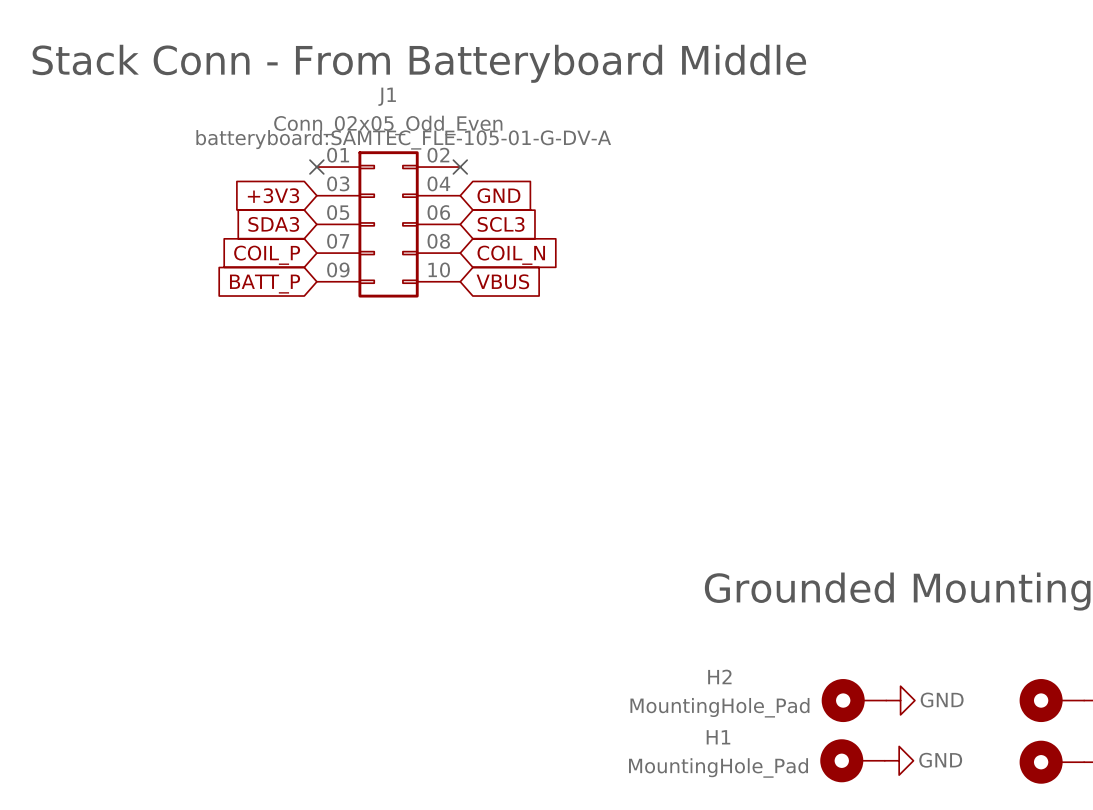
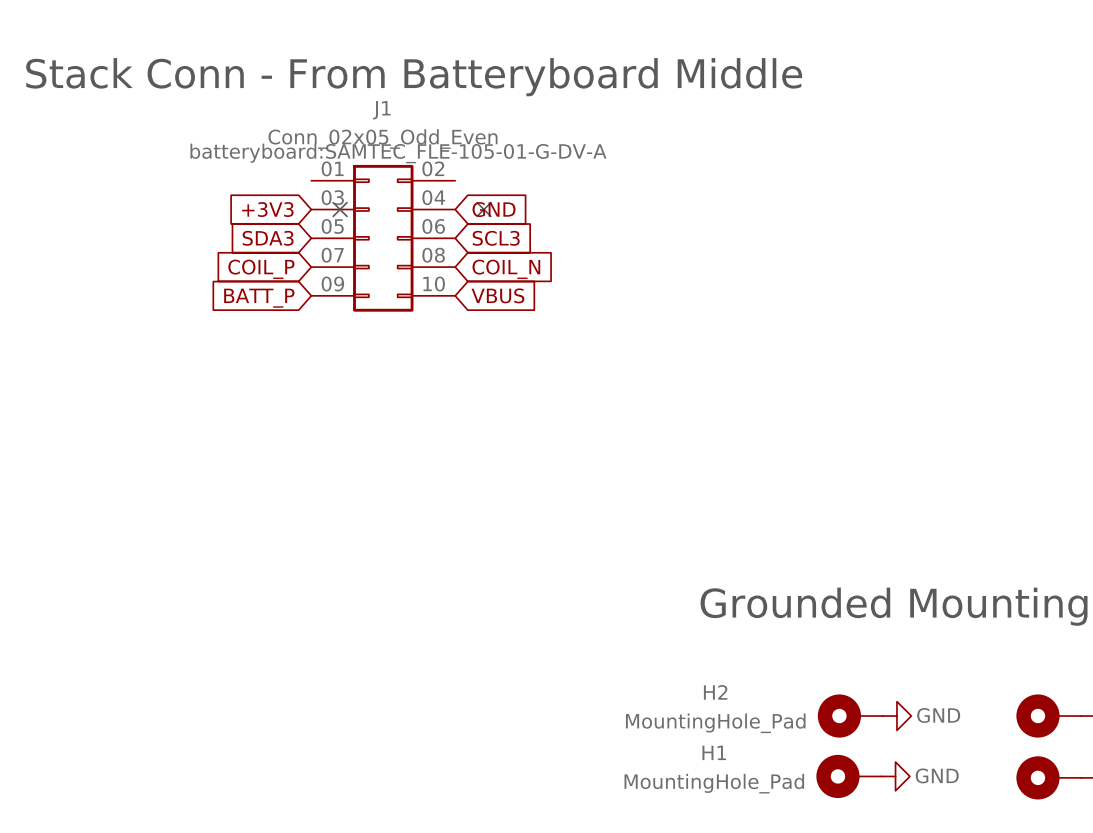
no-connect mark position: (316, 167) -> (340, 209)
no-connect mark position: (460, 167) -> (484, 209)

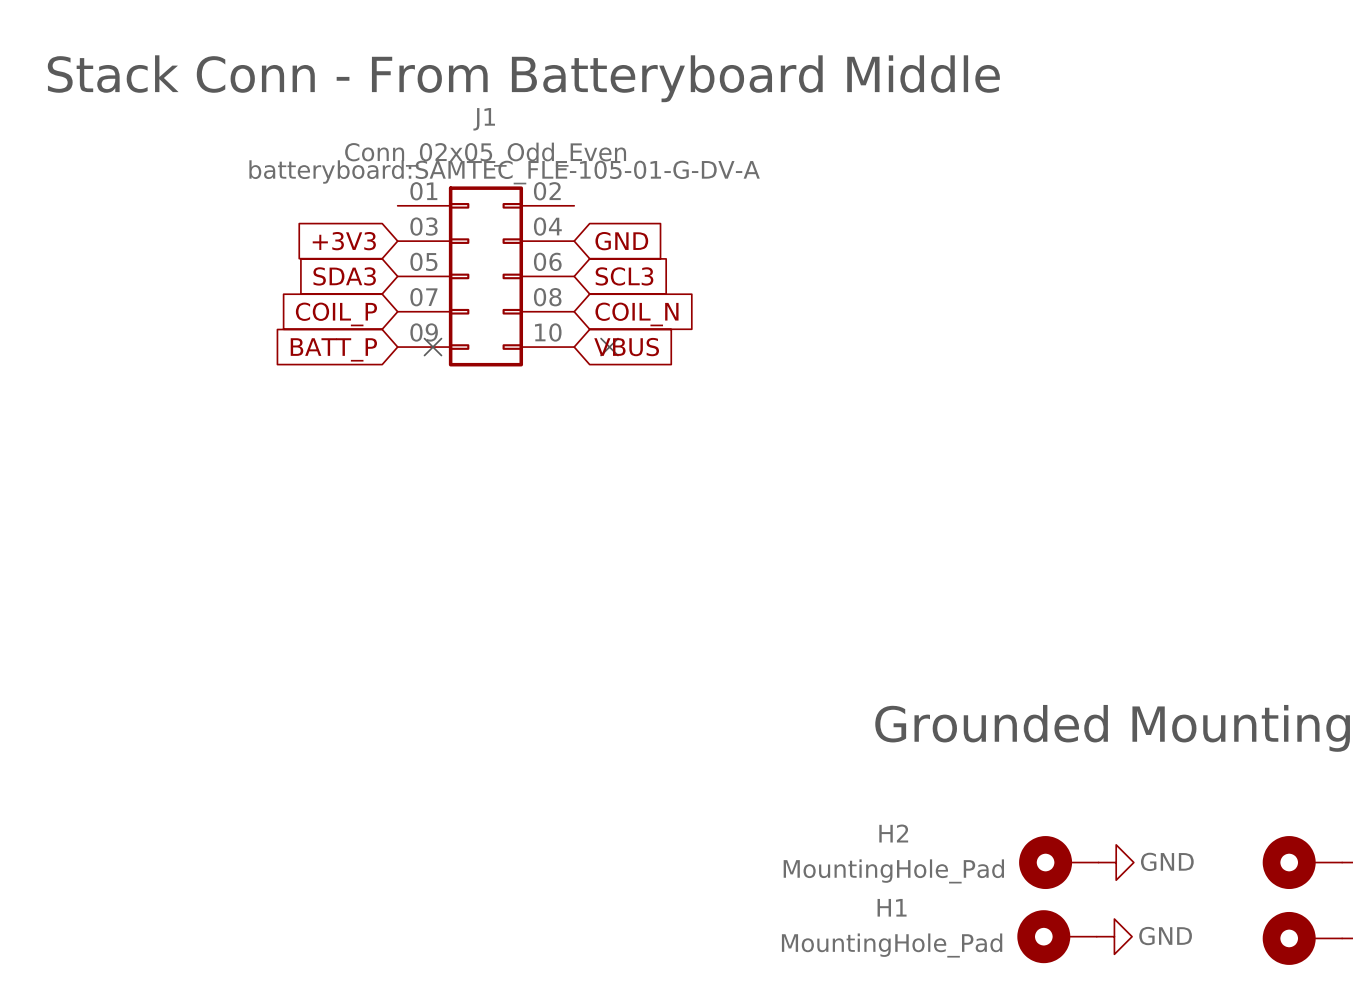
no-connect mark: (340, 209) -> none
no-connect mark: (484, 209) -> none
no-connect mark: none -> (432, 347)
no-connect mark: none -> (609, 347)

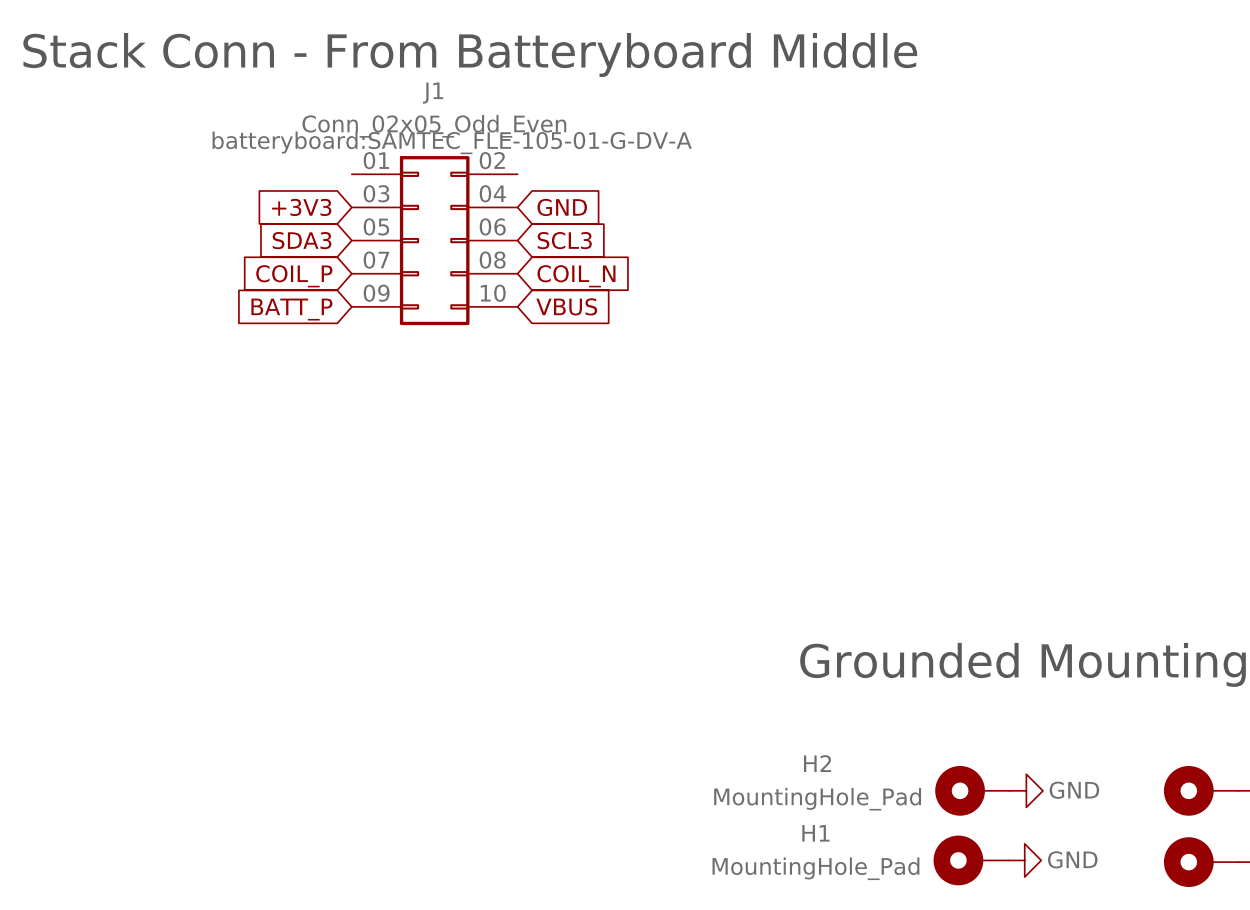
no-connect mark: (432, 347) -> none
no-connect mark: (609, 347) -> none

